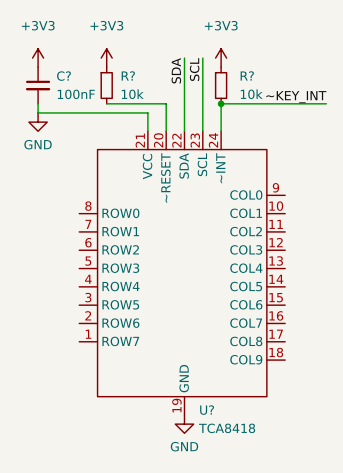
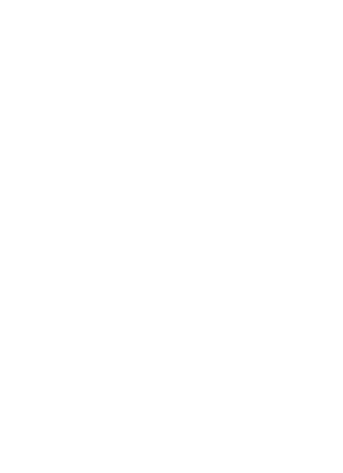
power symbol: +3V3 (38, 58) -> none
power symbol: +3V3 (106, 58) -> none
wire: (184, 58) (184, 131) -> none
wire: (202, 58) (202, 131) -> none
power symbol: +3V3 (221, 58) -> none
label: SCL (194, 69) -> none
label: SDA (176, 70) -> none
C?: 100nF (38, 85) -> none
R?: 10k (106, 85) -> none
R?: 10k (221, 85) -> none
label: ~KEY_INT (296, 97) -> none
wire: (38, 103) (38, 112) (147, 112) (147, 131) -> none
wire: (106, 103) (166, 103) (166, 131) -> none
junction: (221, 103) -> none
wire: (326, 103) (221, 103) (221, 131) -> none
power symbol: GND (38, 122) -> none
U?: TCA8418 (182, 273) -> none
power symbol: GND (184, 424) -> none

